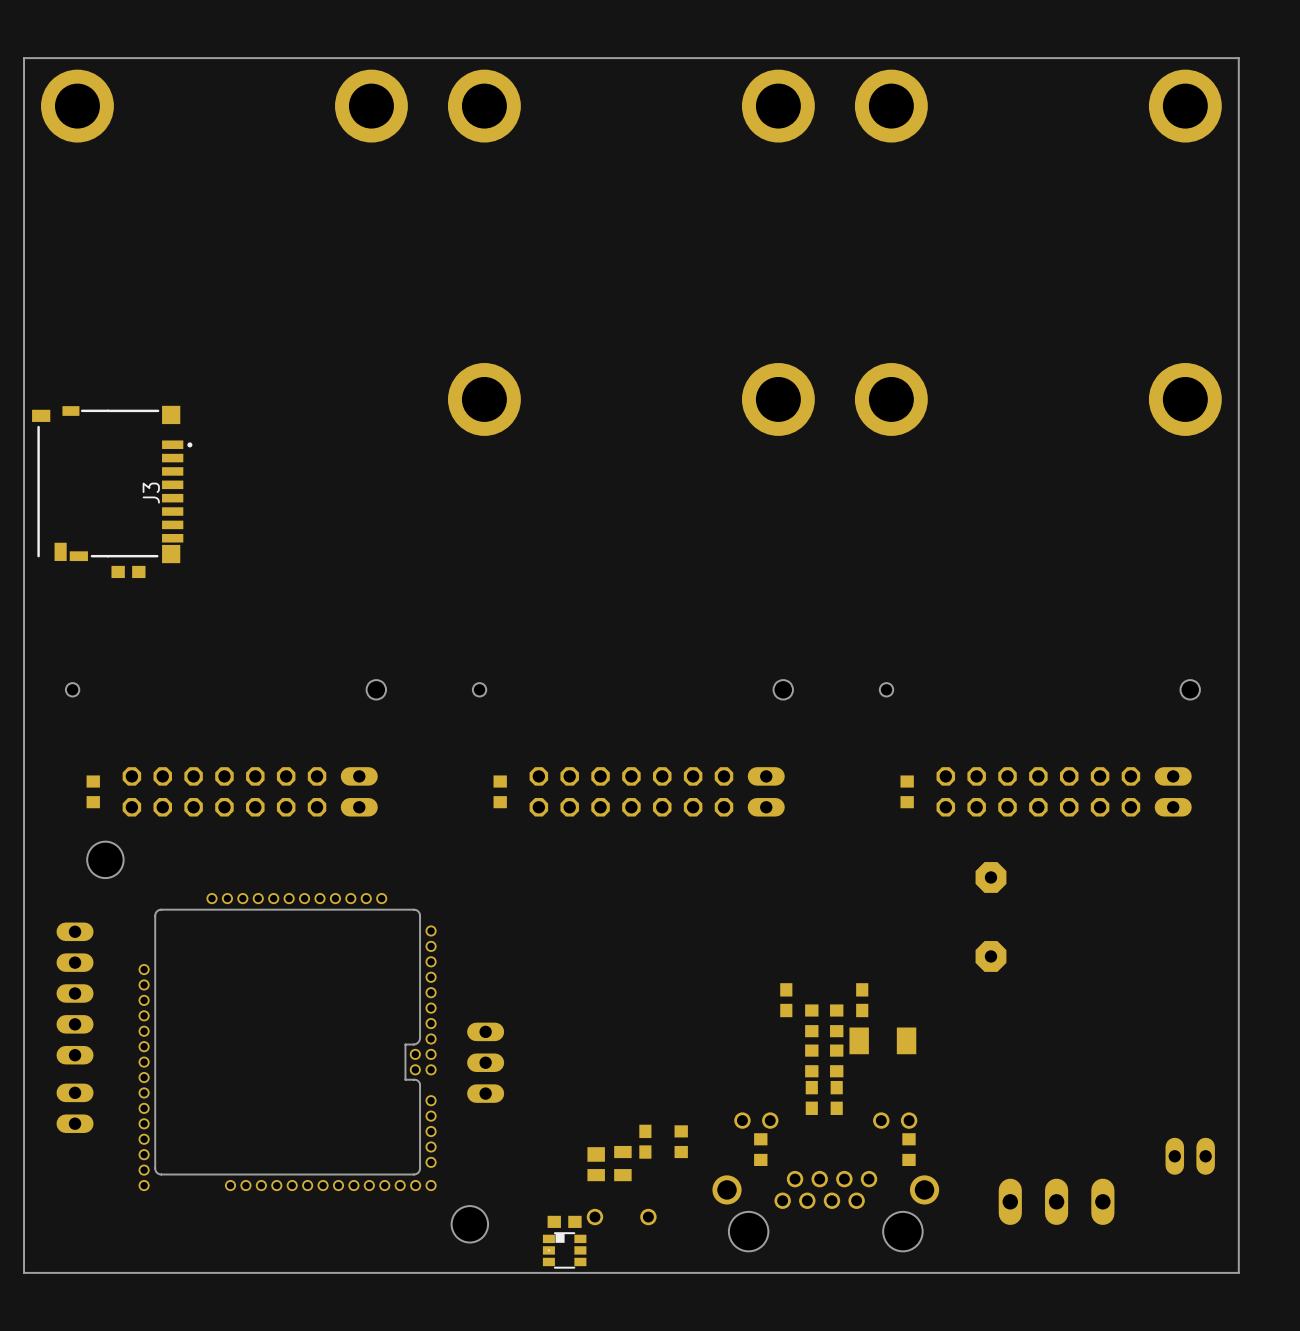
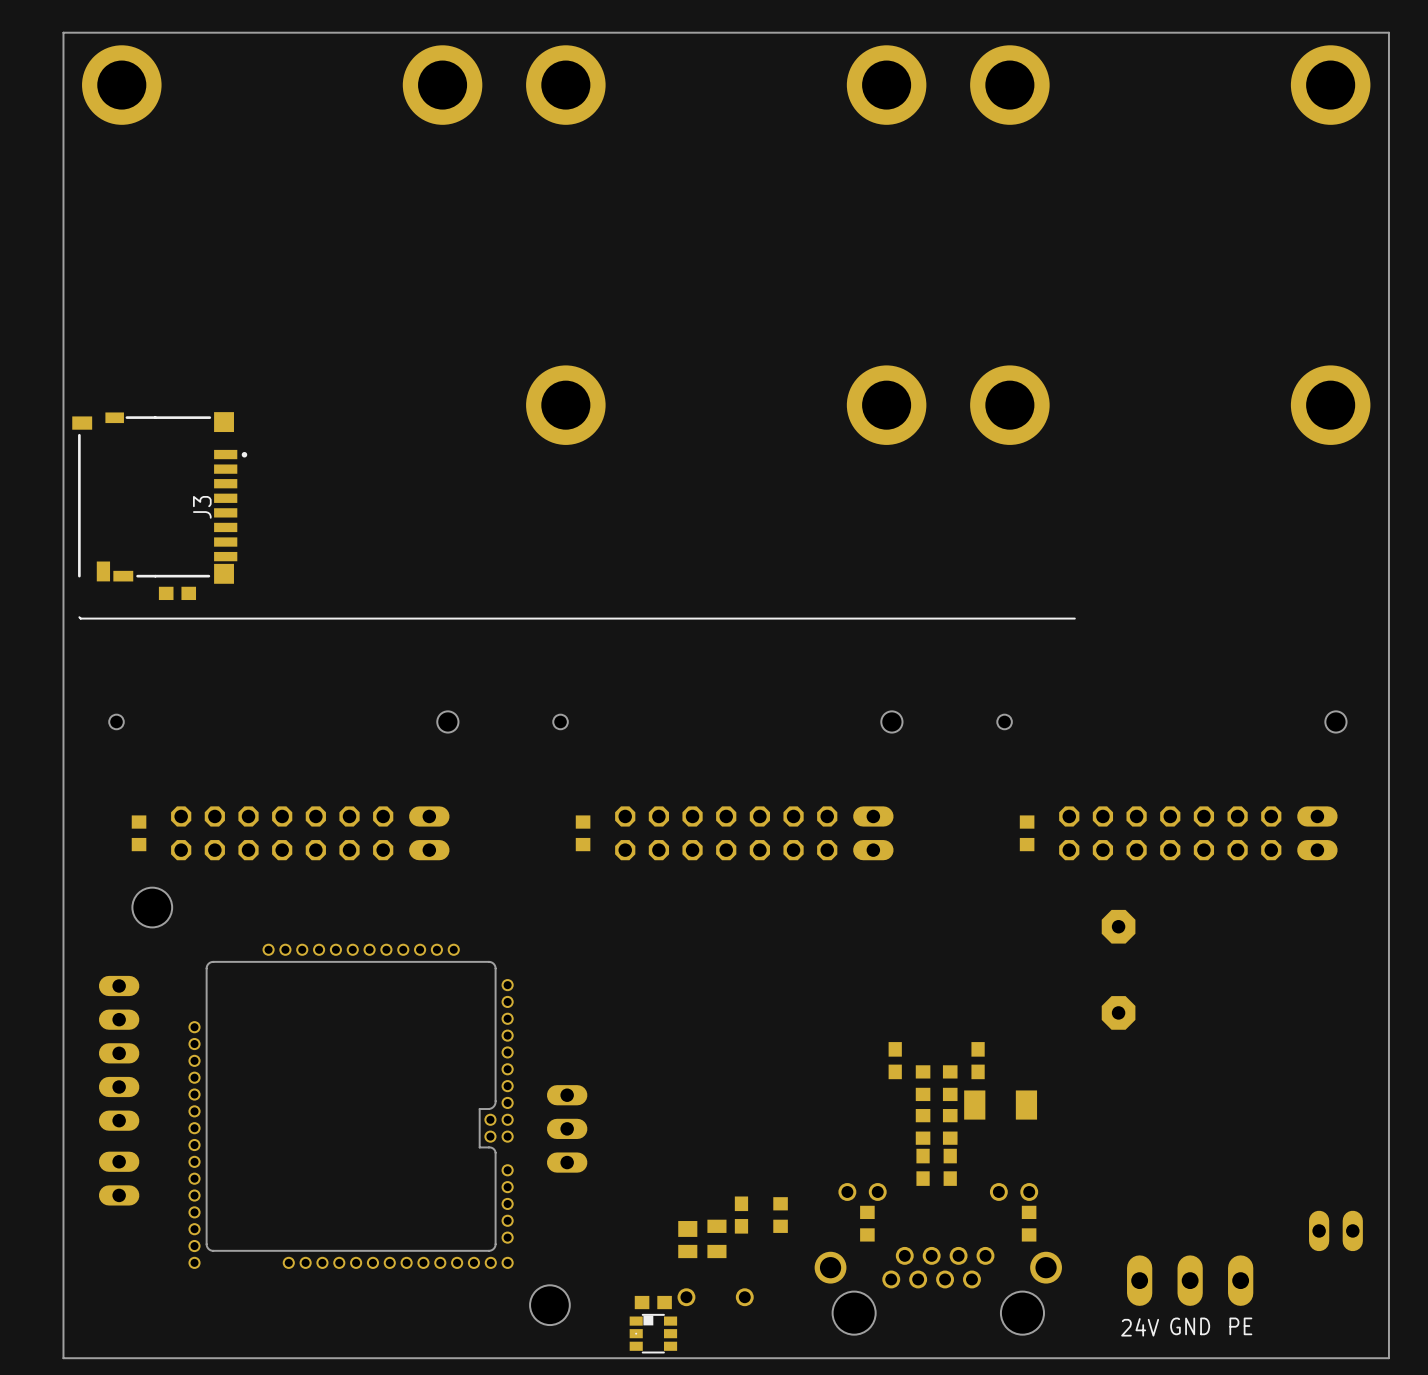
line: none -> (79, 617) (1074, 618)
text: none -> GND (1190, 1326)
text: none -> PE (1240, 1326)
text: none -> 24V (1140, 1327)

